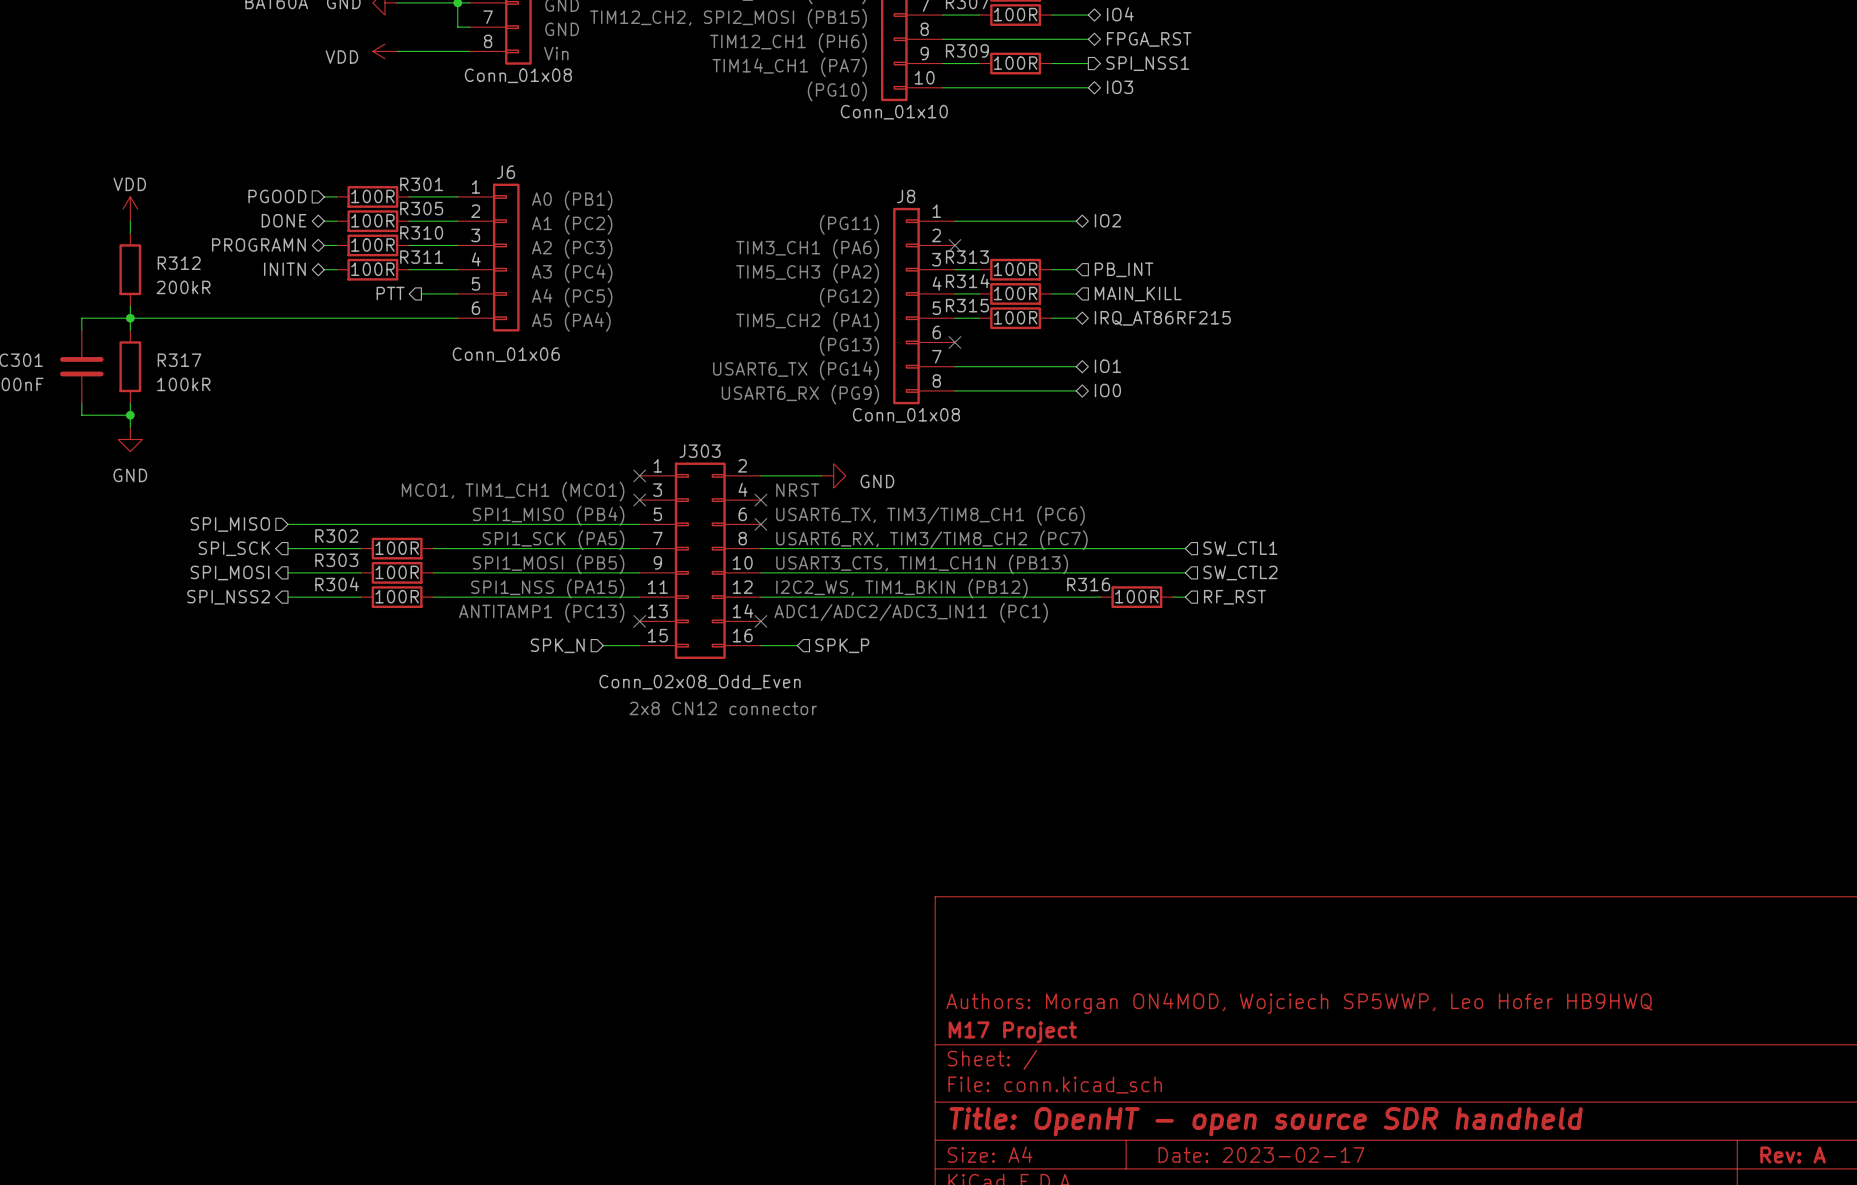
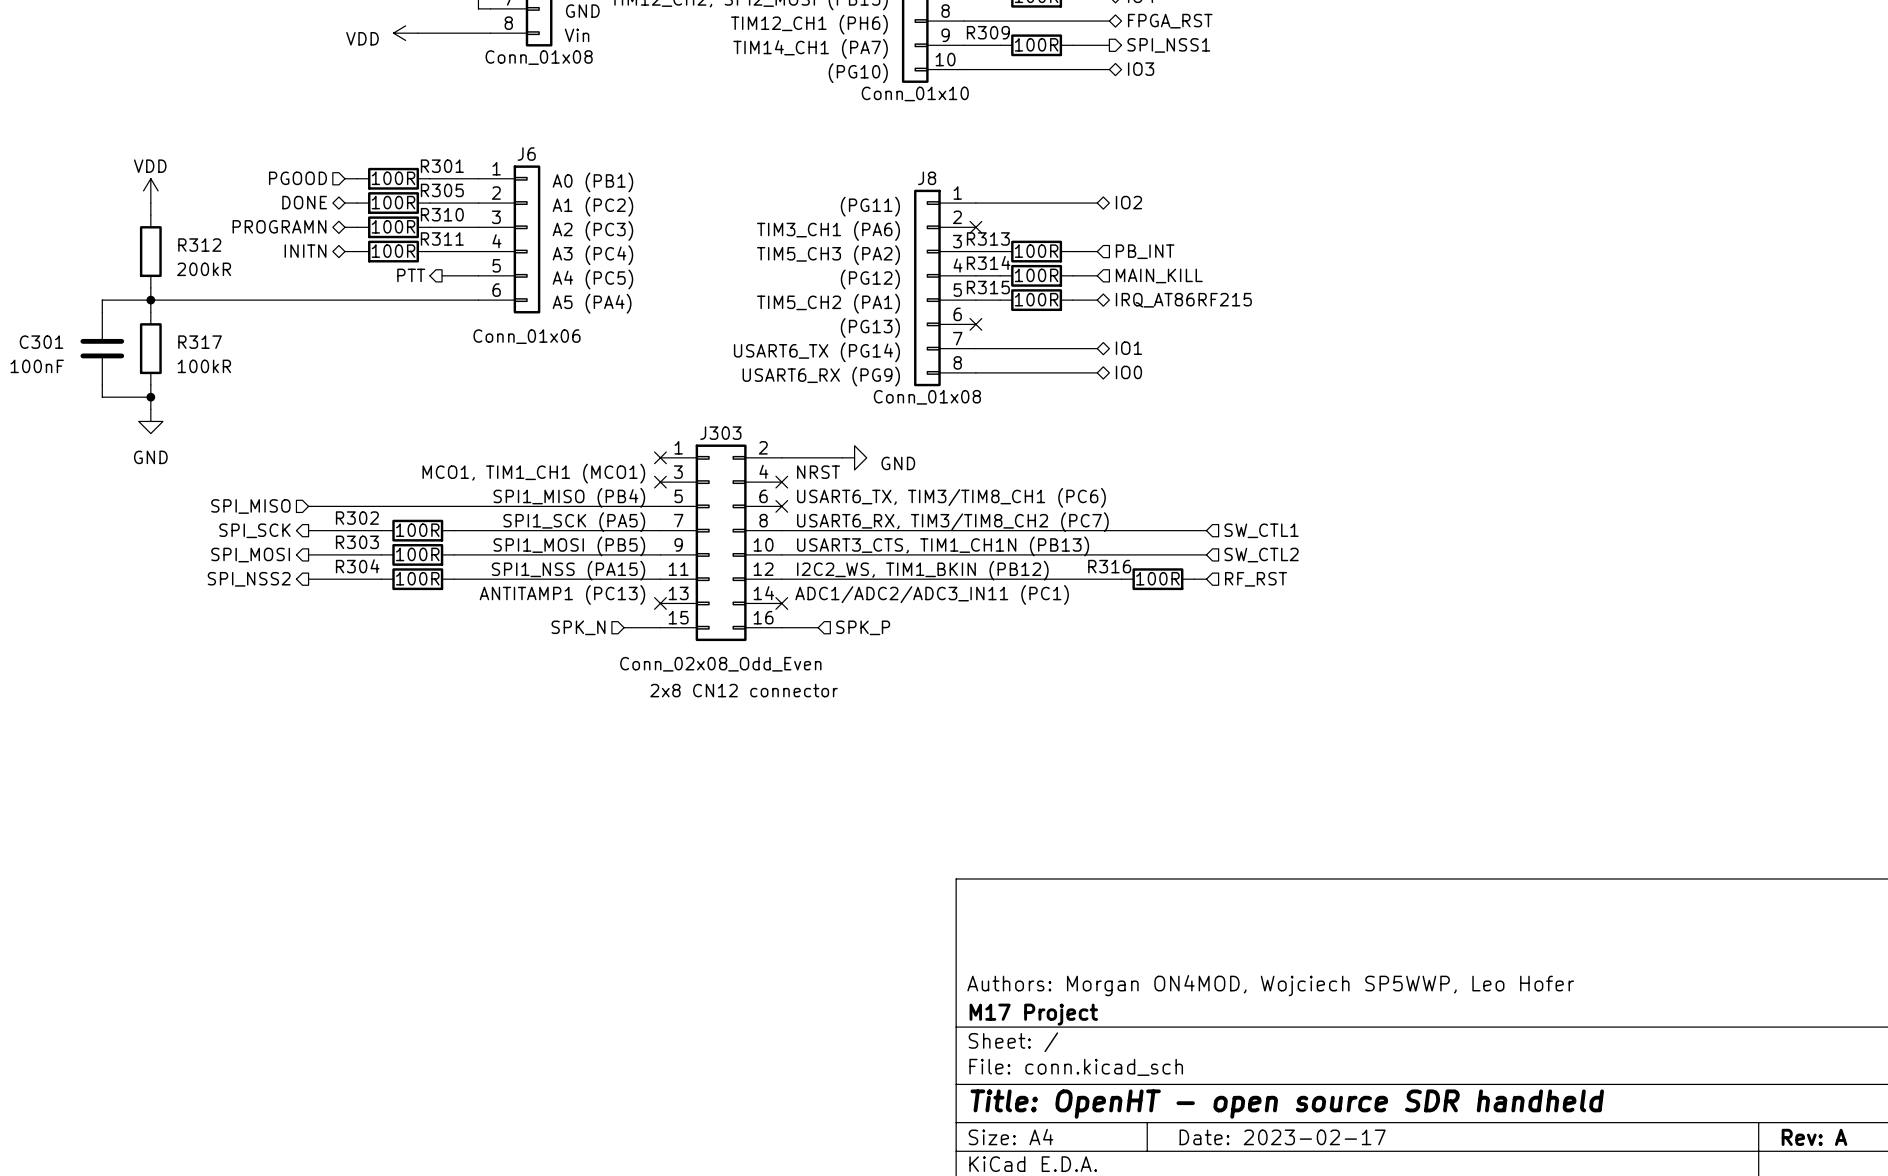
title block: Authors: Morgan ON4MOD, Wojciech SP5WWP, Leo Hofer HB9HWQ (1299, 1003) -> Authors: Morgan ON4MOD, Wojciech SP5WWP, Leo Hofer (1270, 985)

